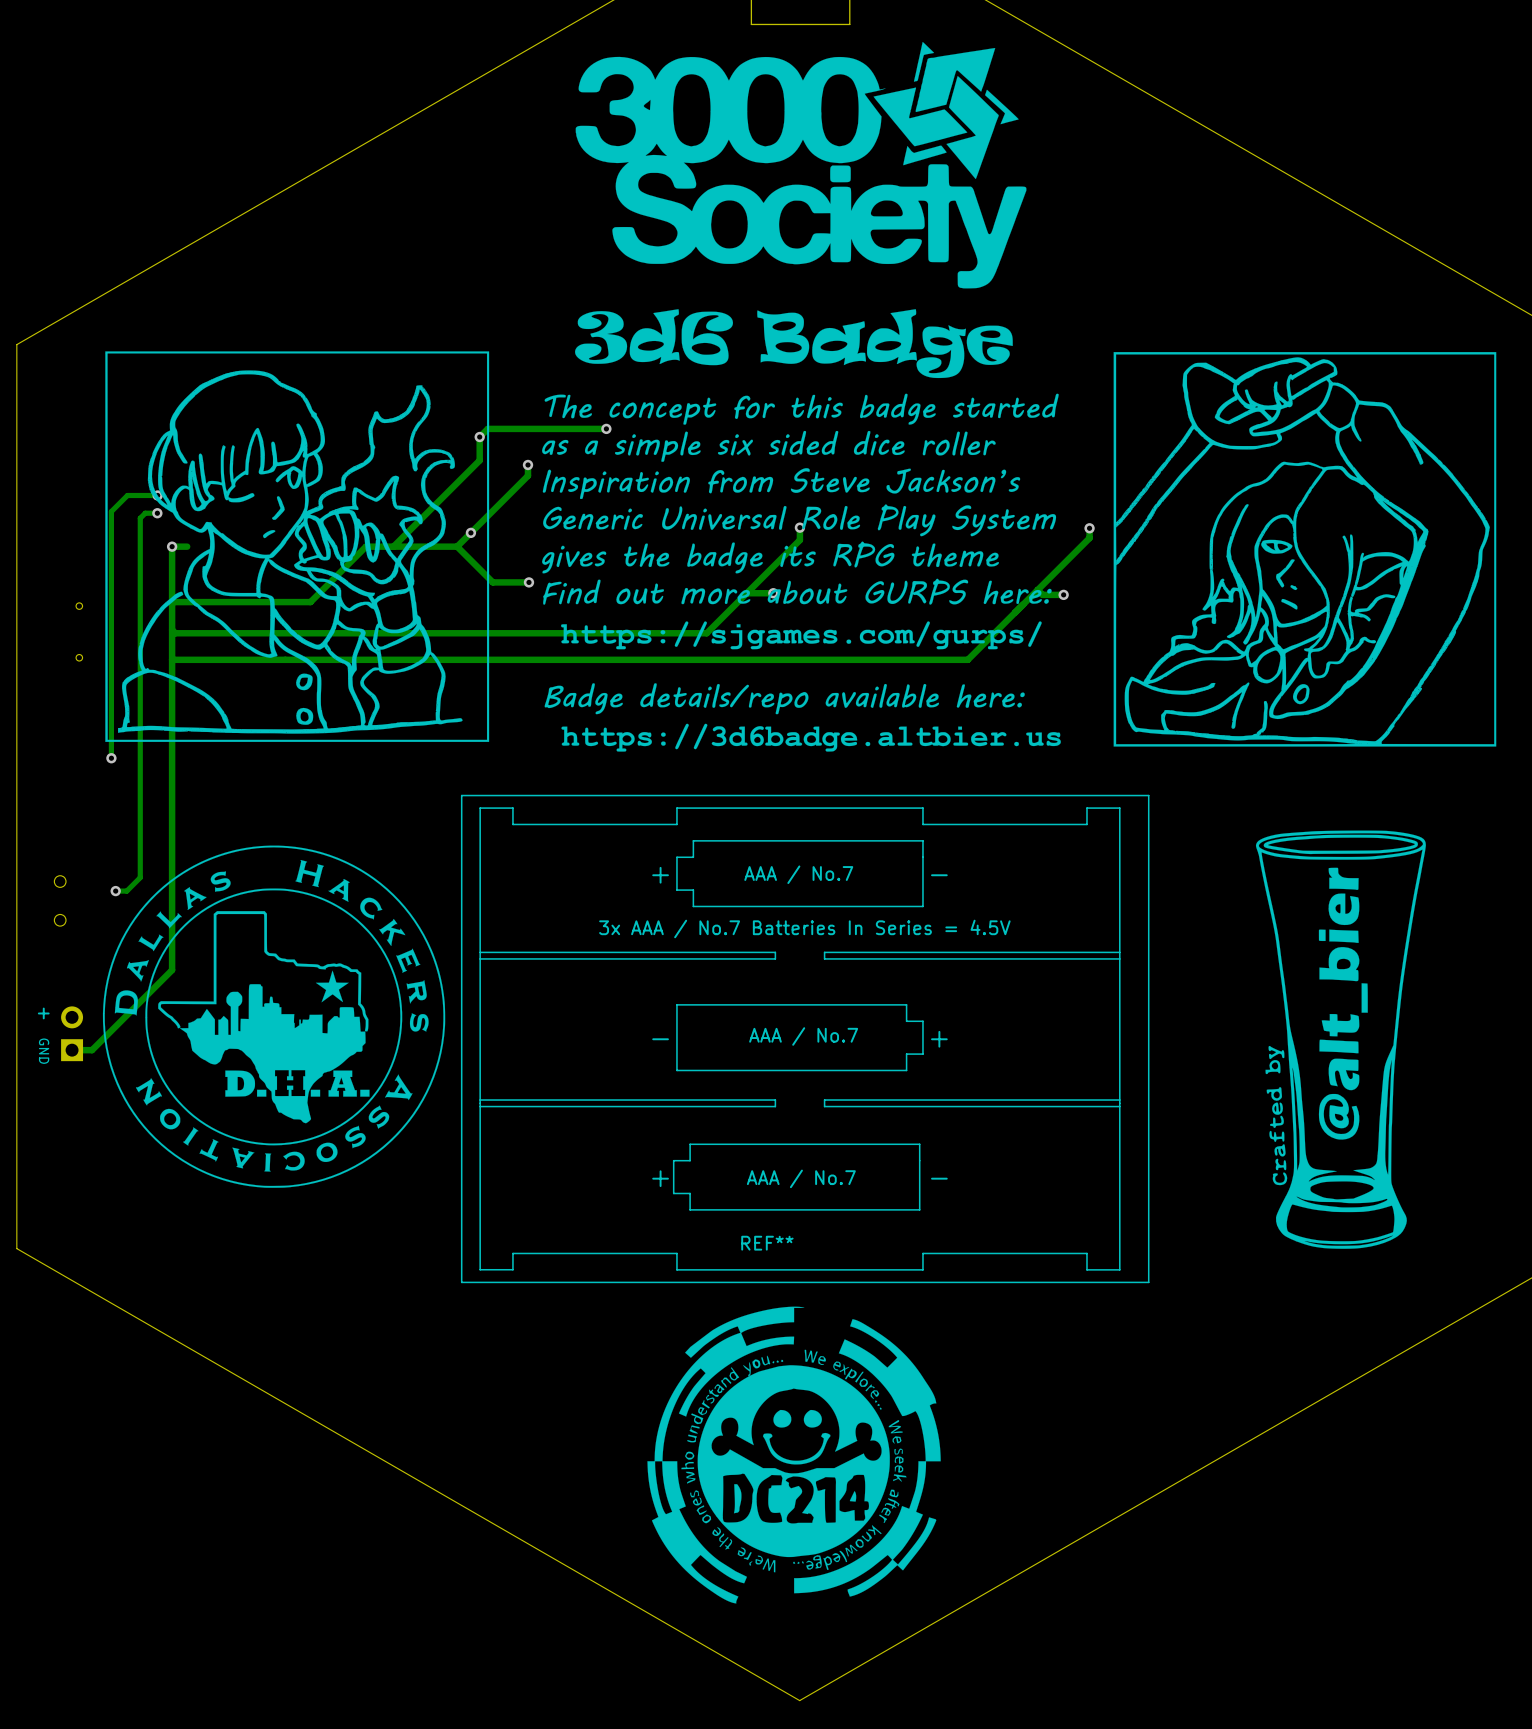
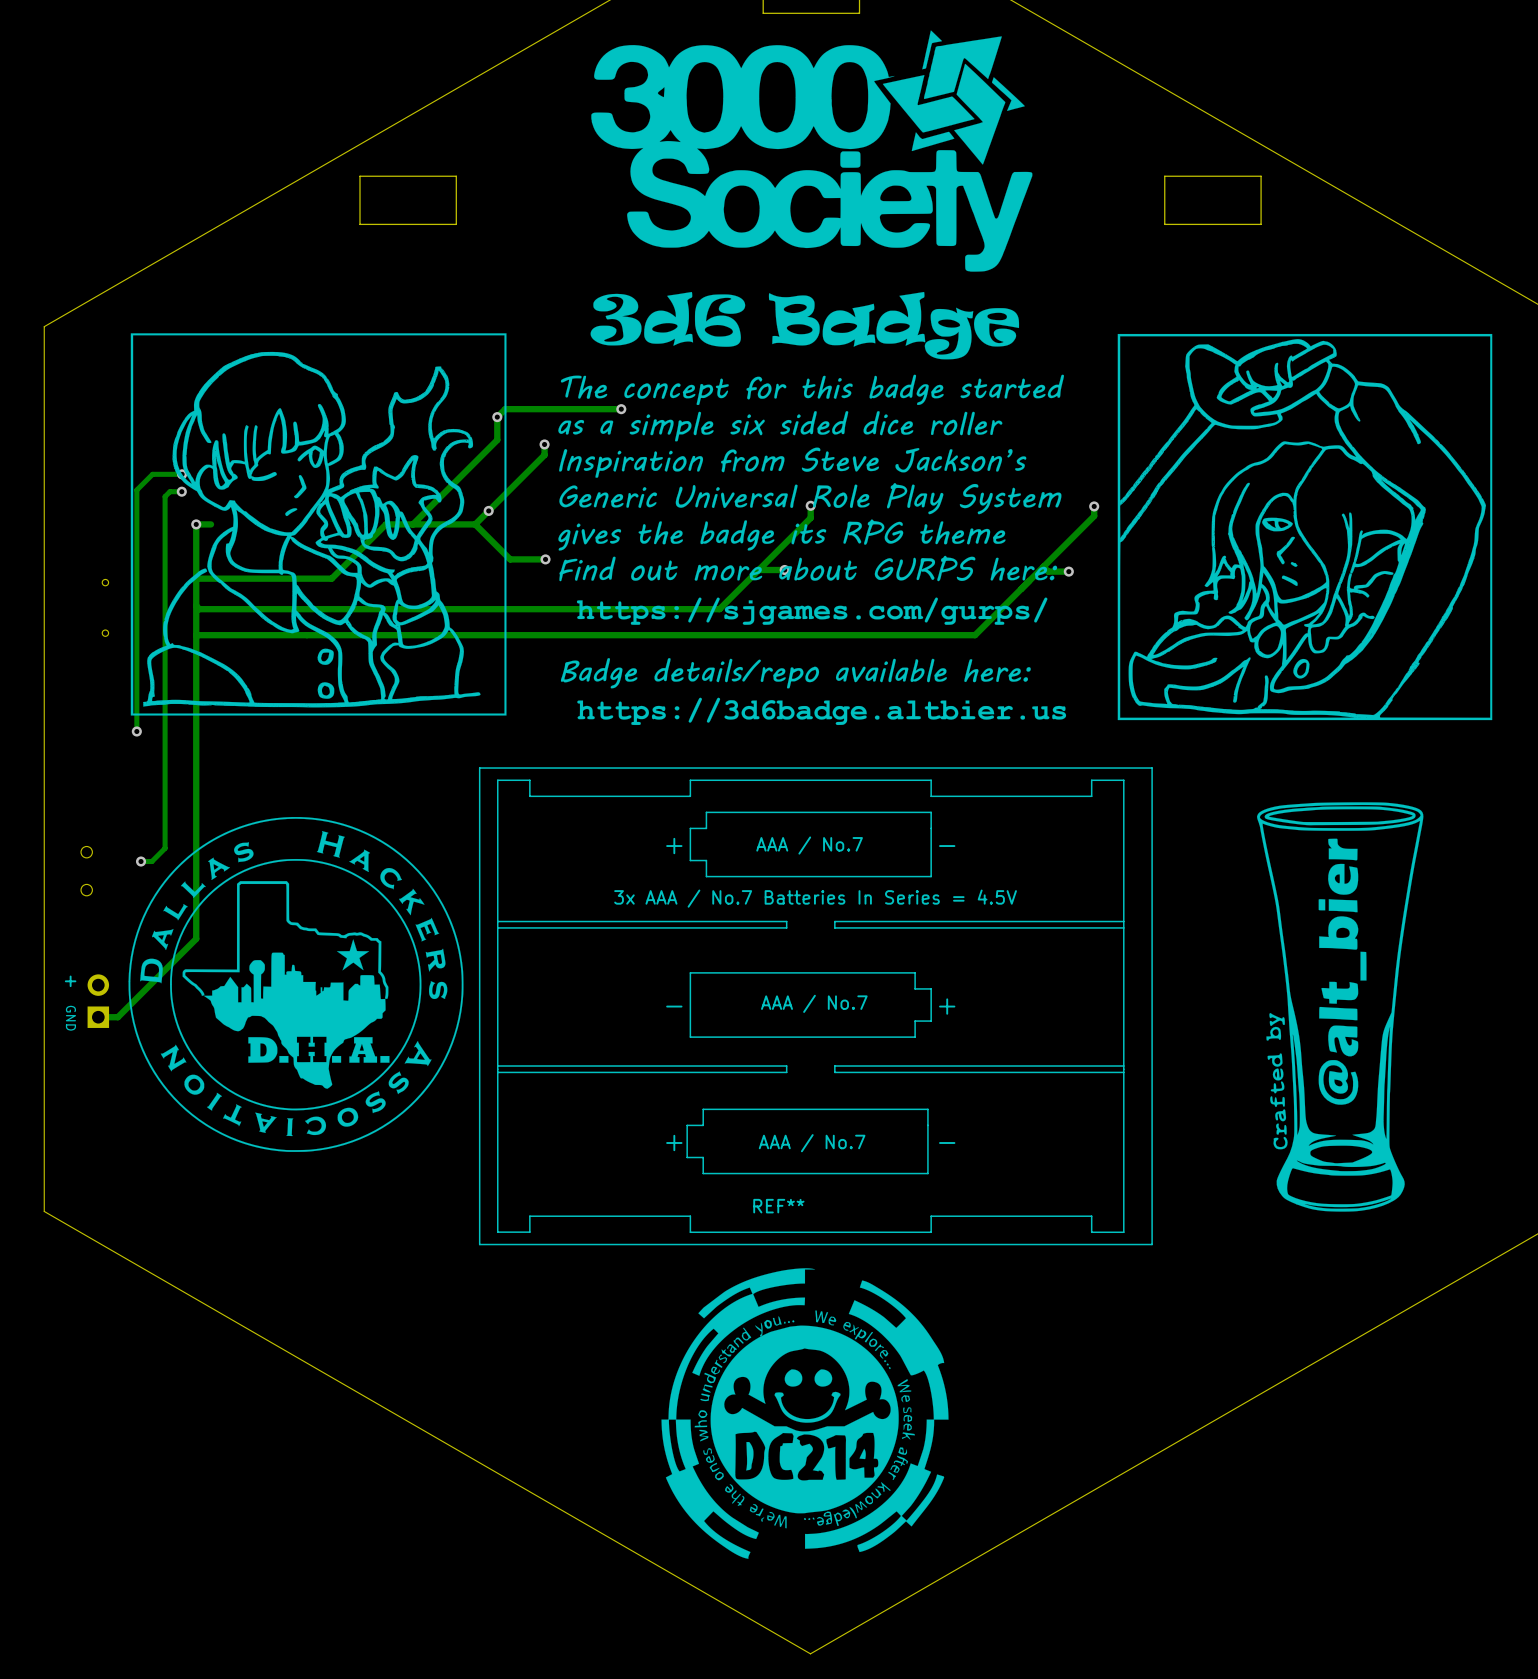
board edge: none -> (456, 176) (360, 176) (360, 224) (456, 224) (456, 176)
board edge: none -> (1261, 176) (1261, 224) (1164, 224) (1164, 176) (1261, 176)

